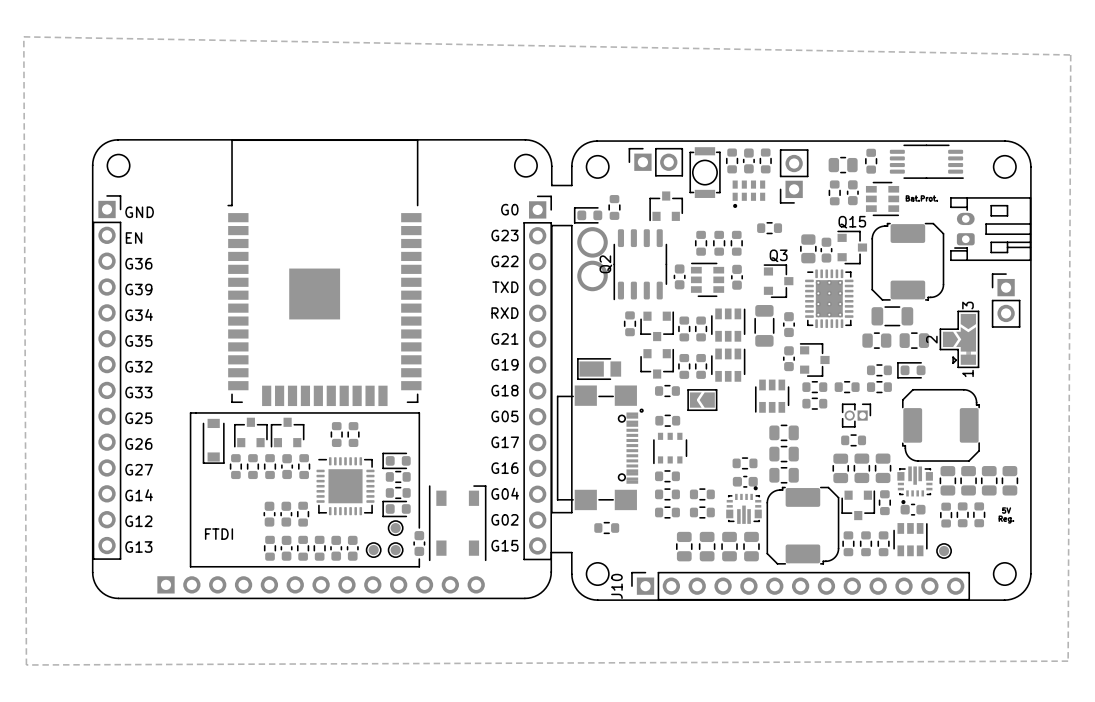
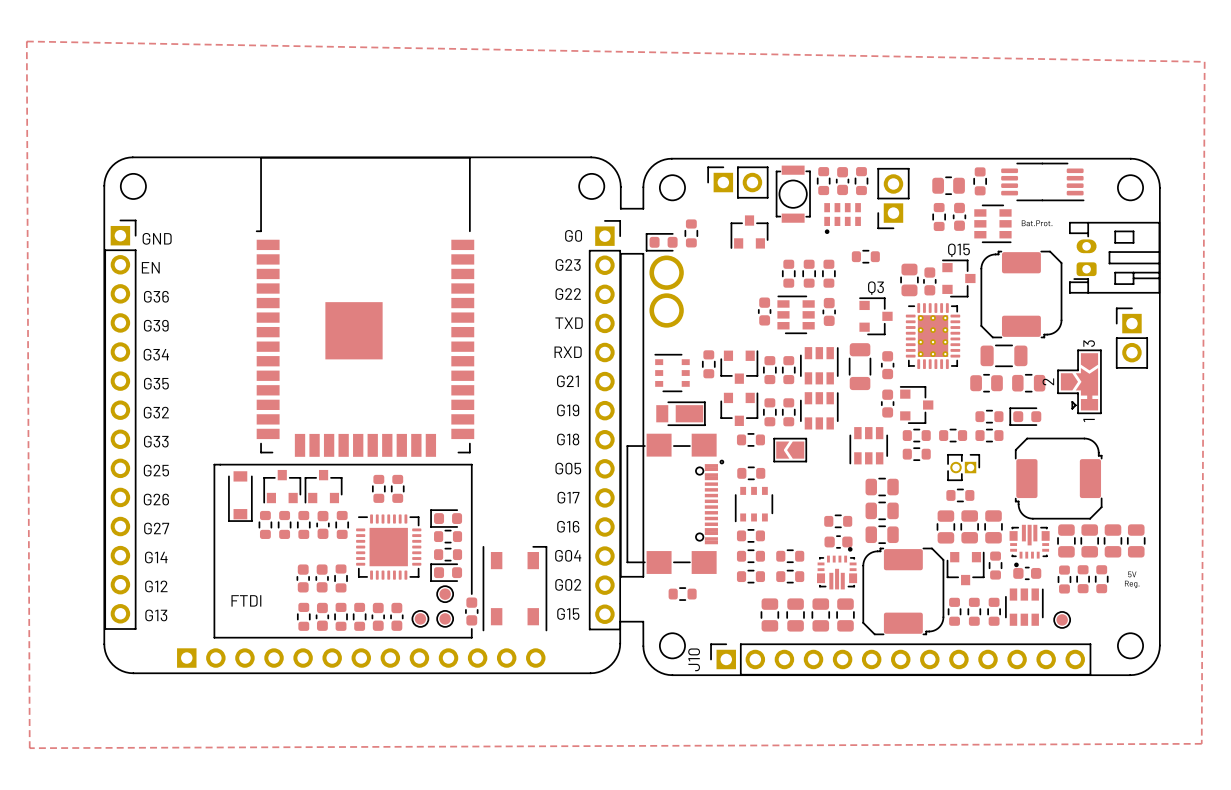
Q2: (640, 264) -> none
part: none -> (672, 373)
part rotation: 0° (599, 369) -> 180° (680, 413)

